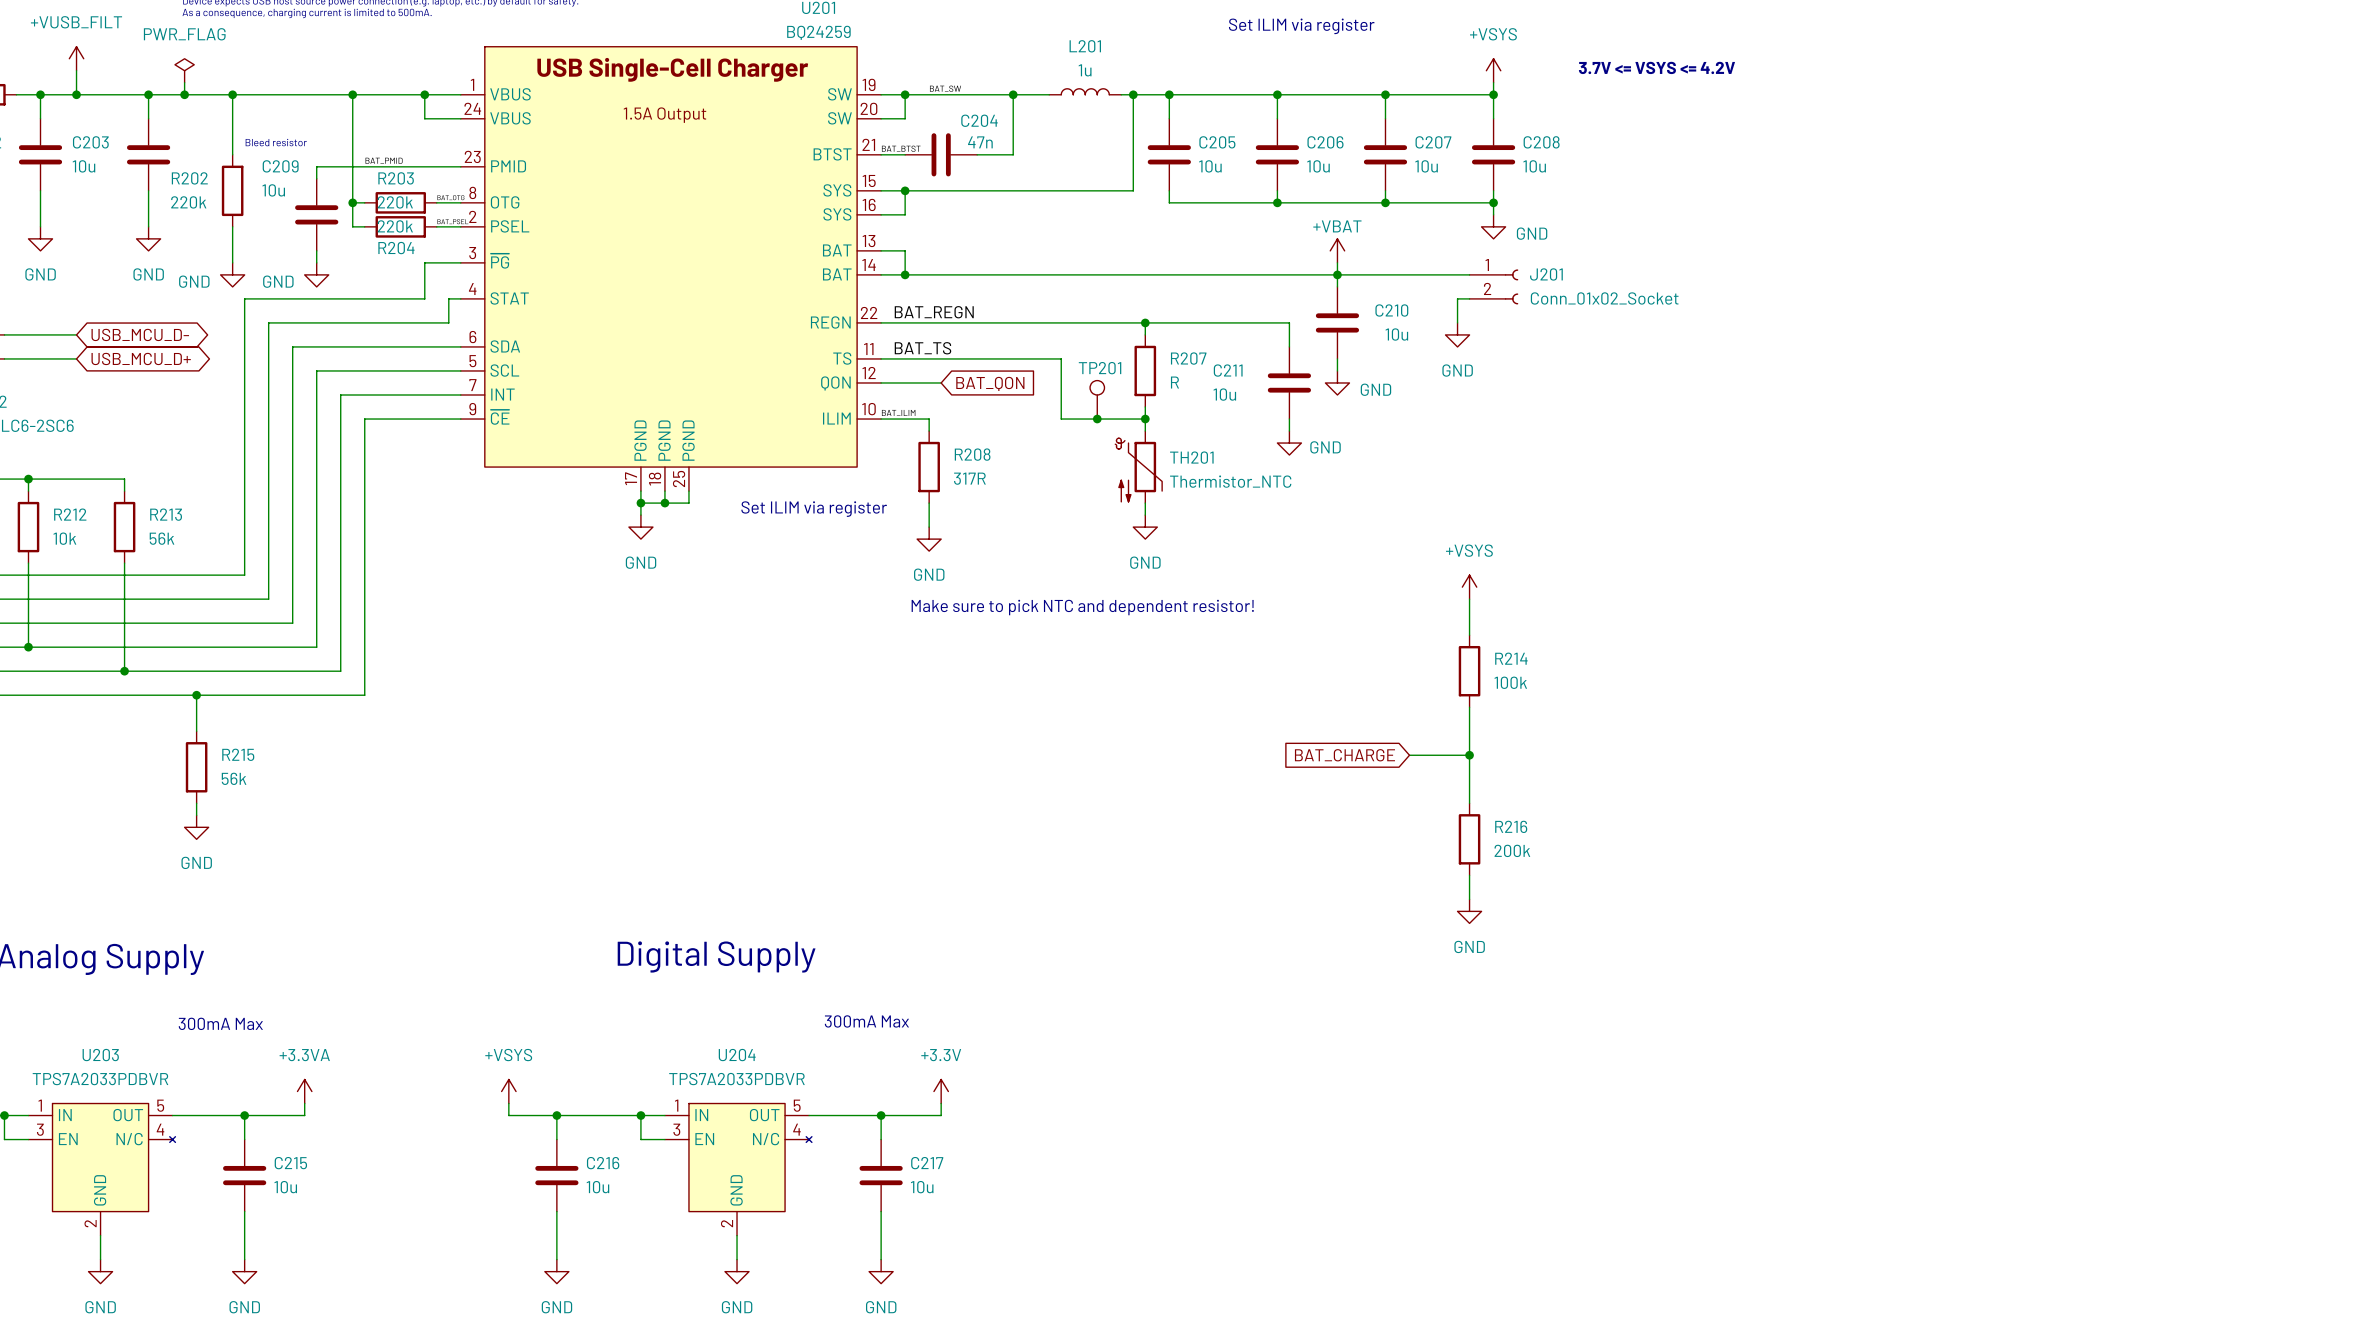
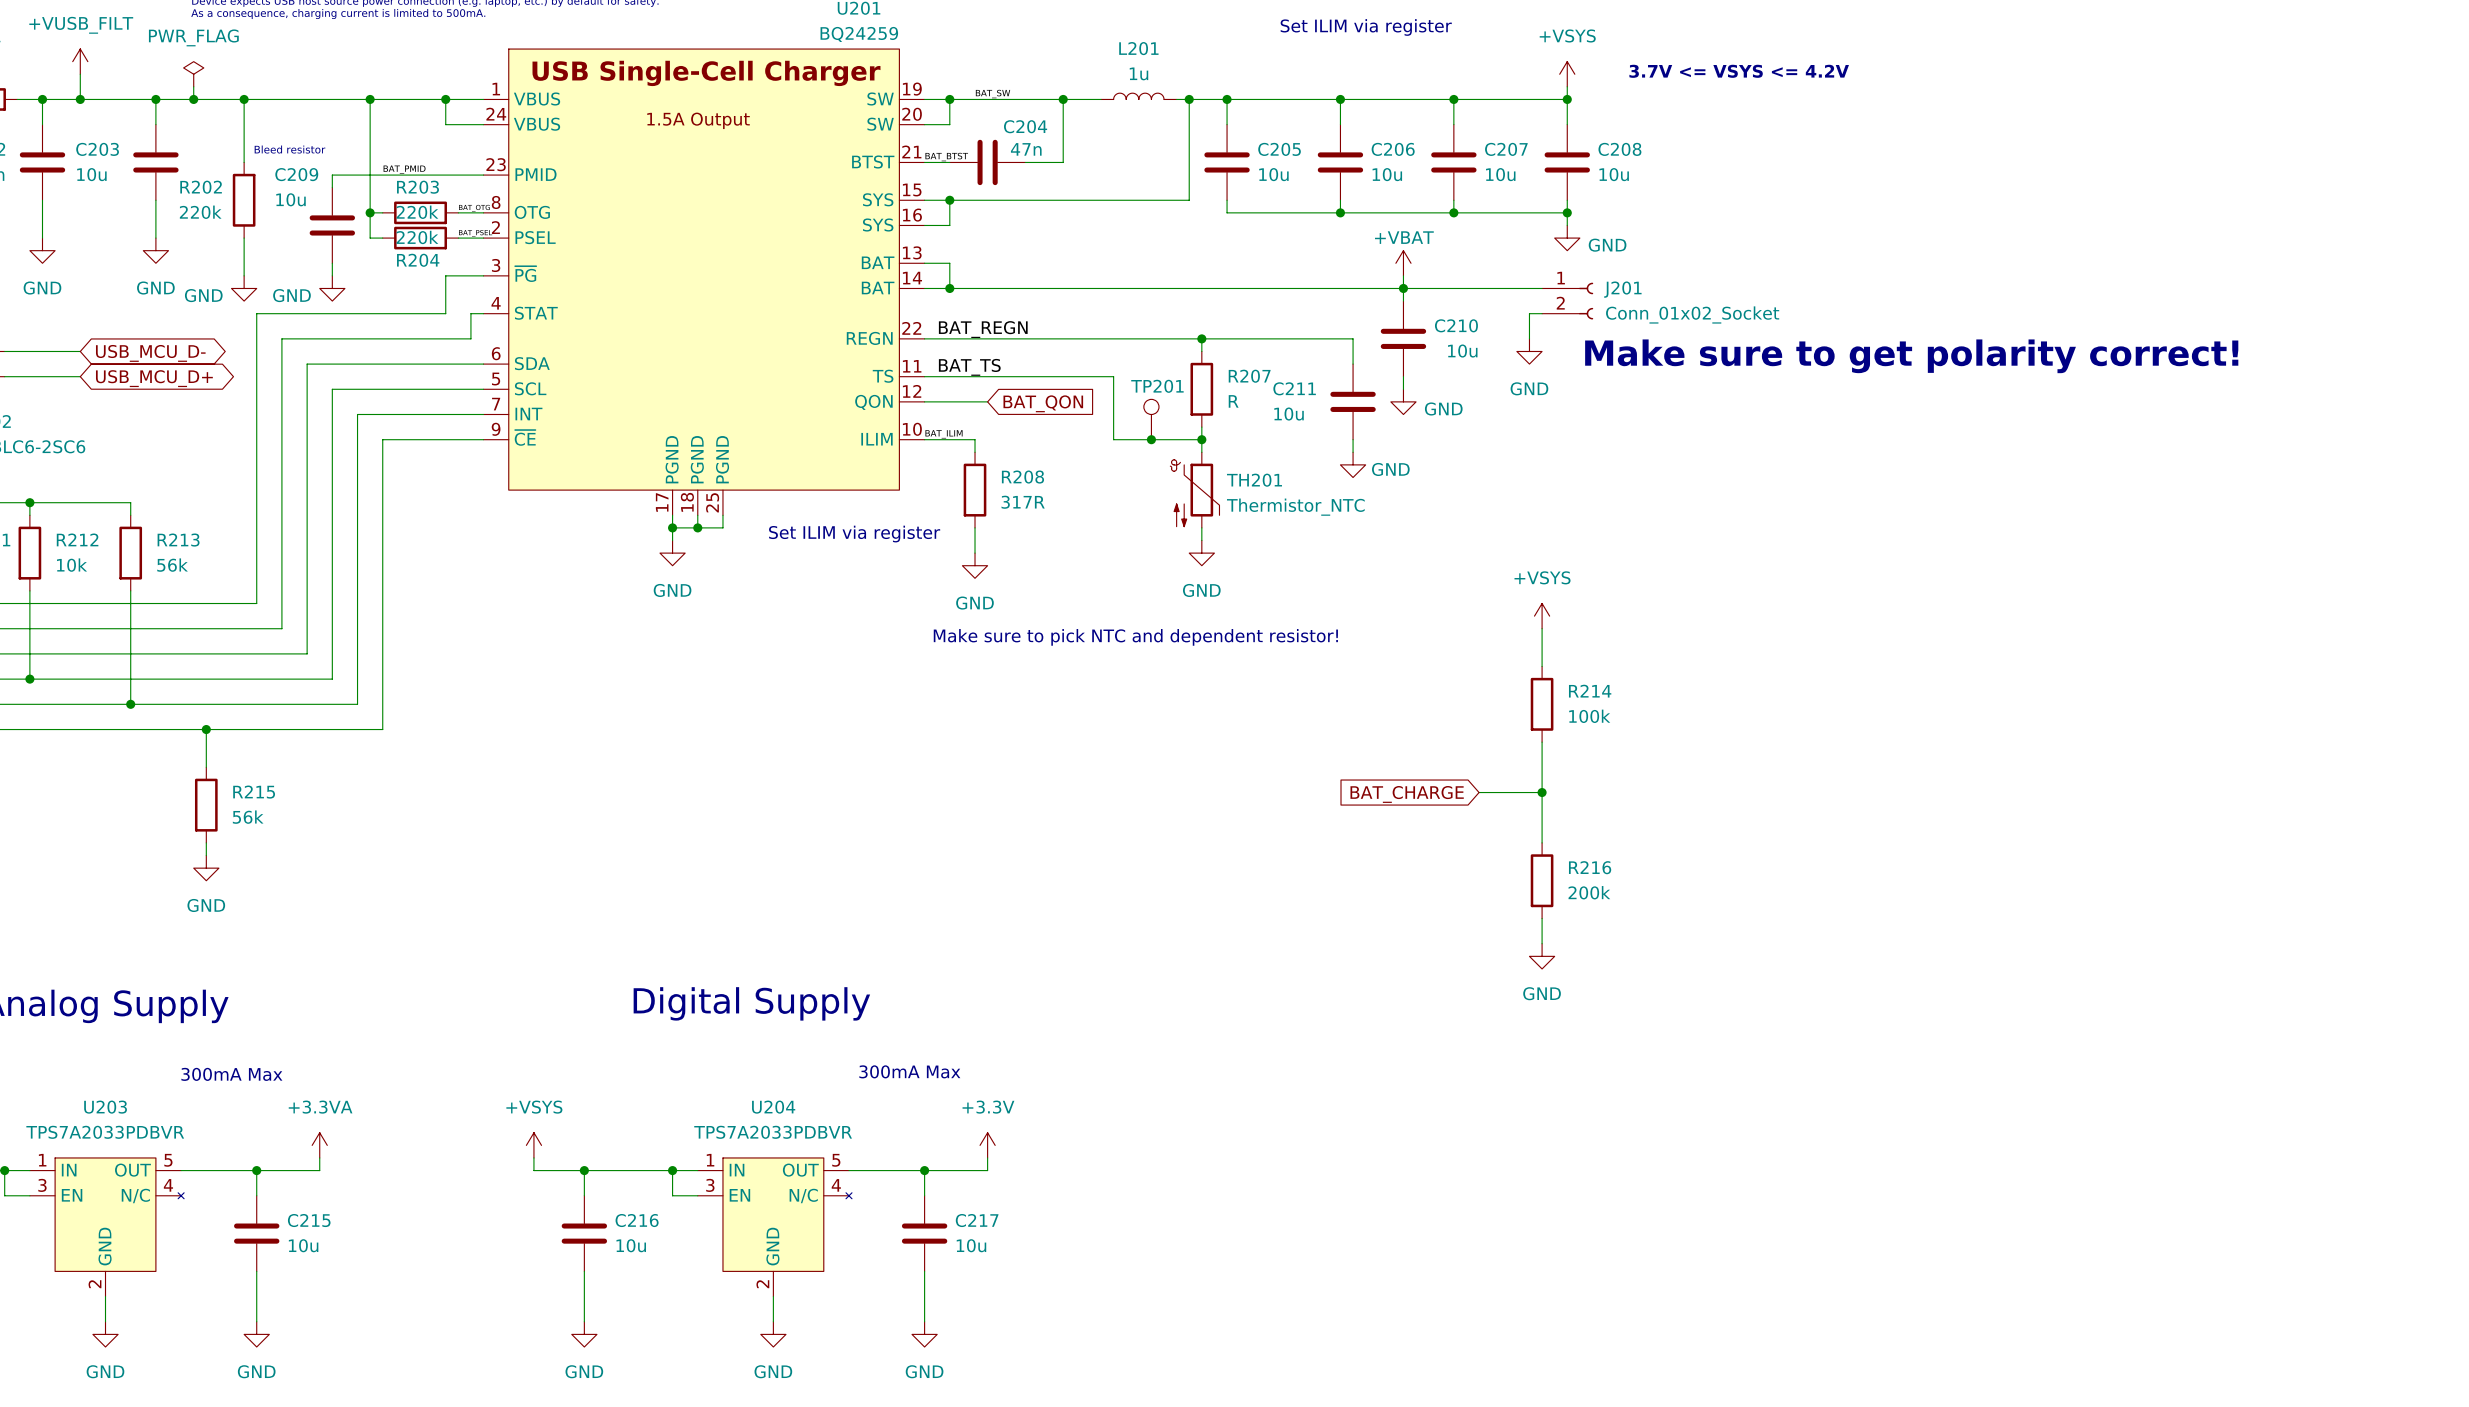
text: none -> Make sure to get polarity correct! (1911, 356)

